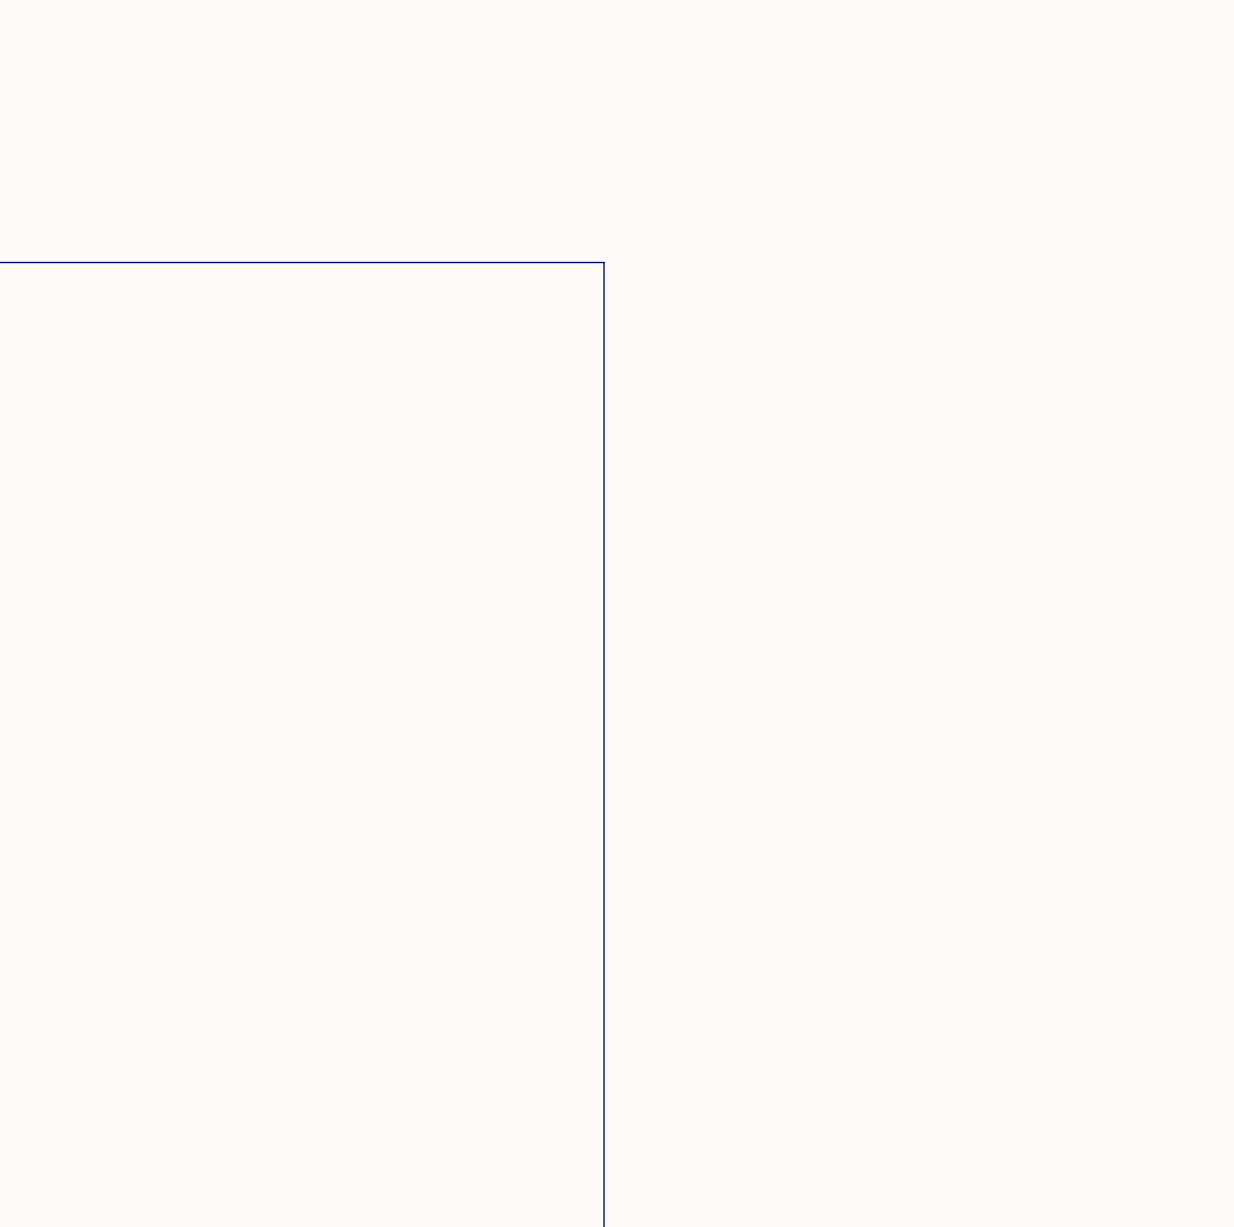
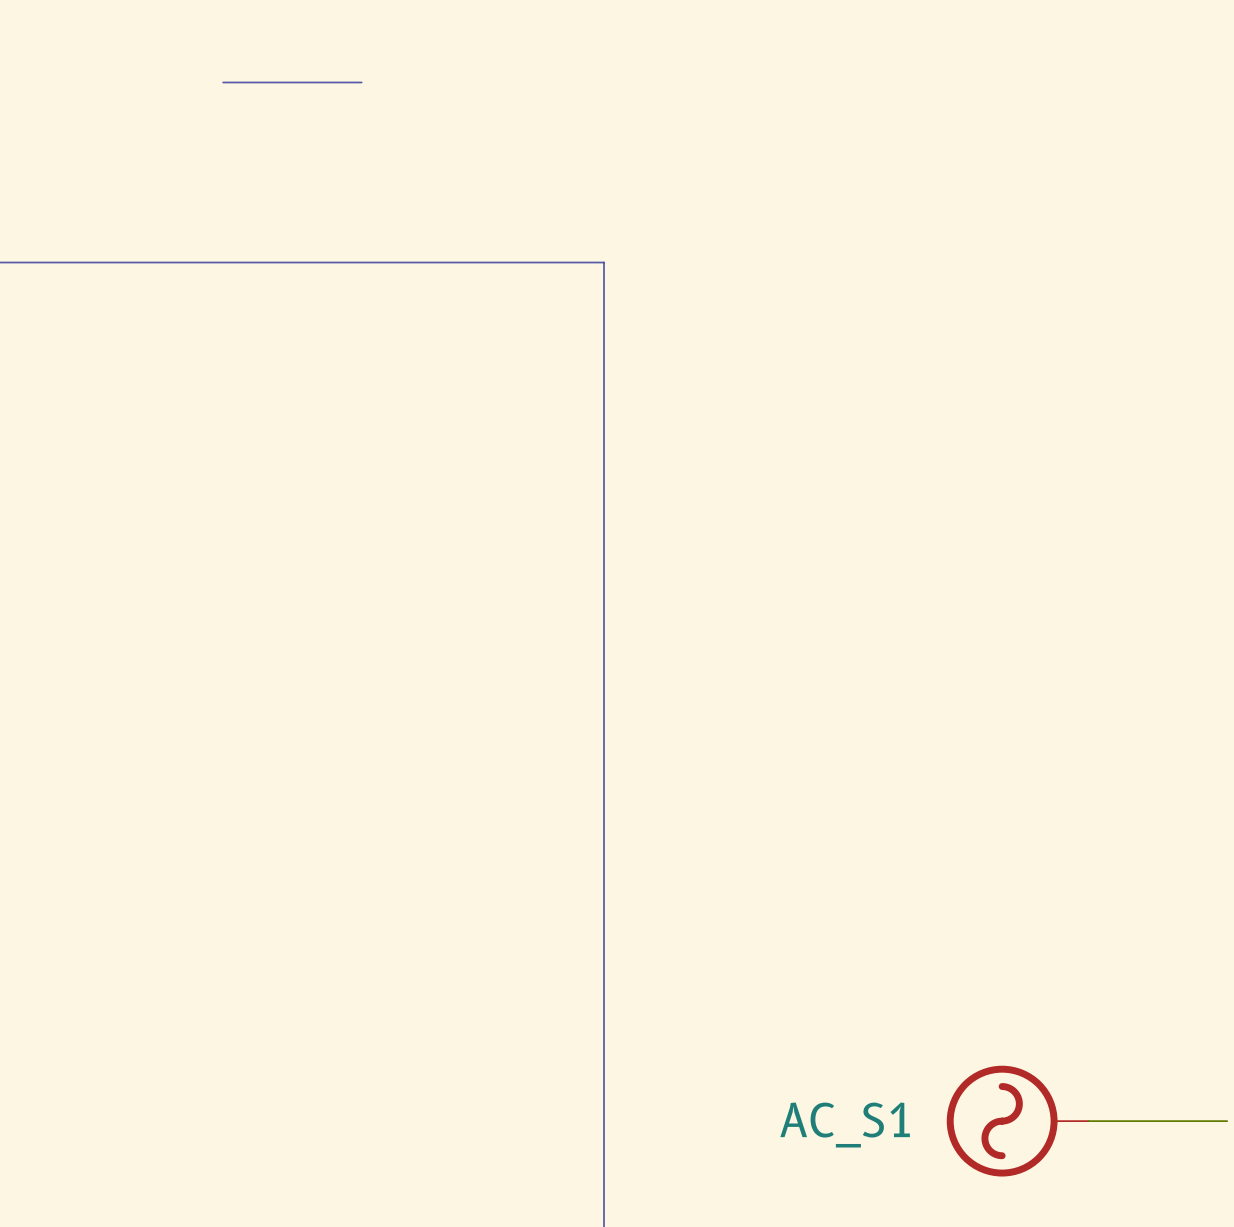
line: none -> (223, 82) (361, 82)
power symbol: none -> AC_S1 (1017, 1121)
wire: none -> (1088, 1121) (1227, 1121)

